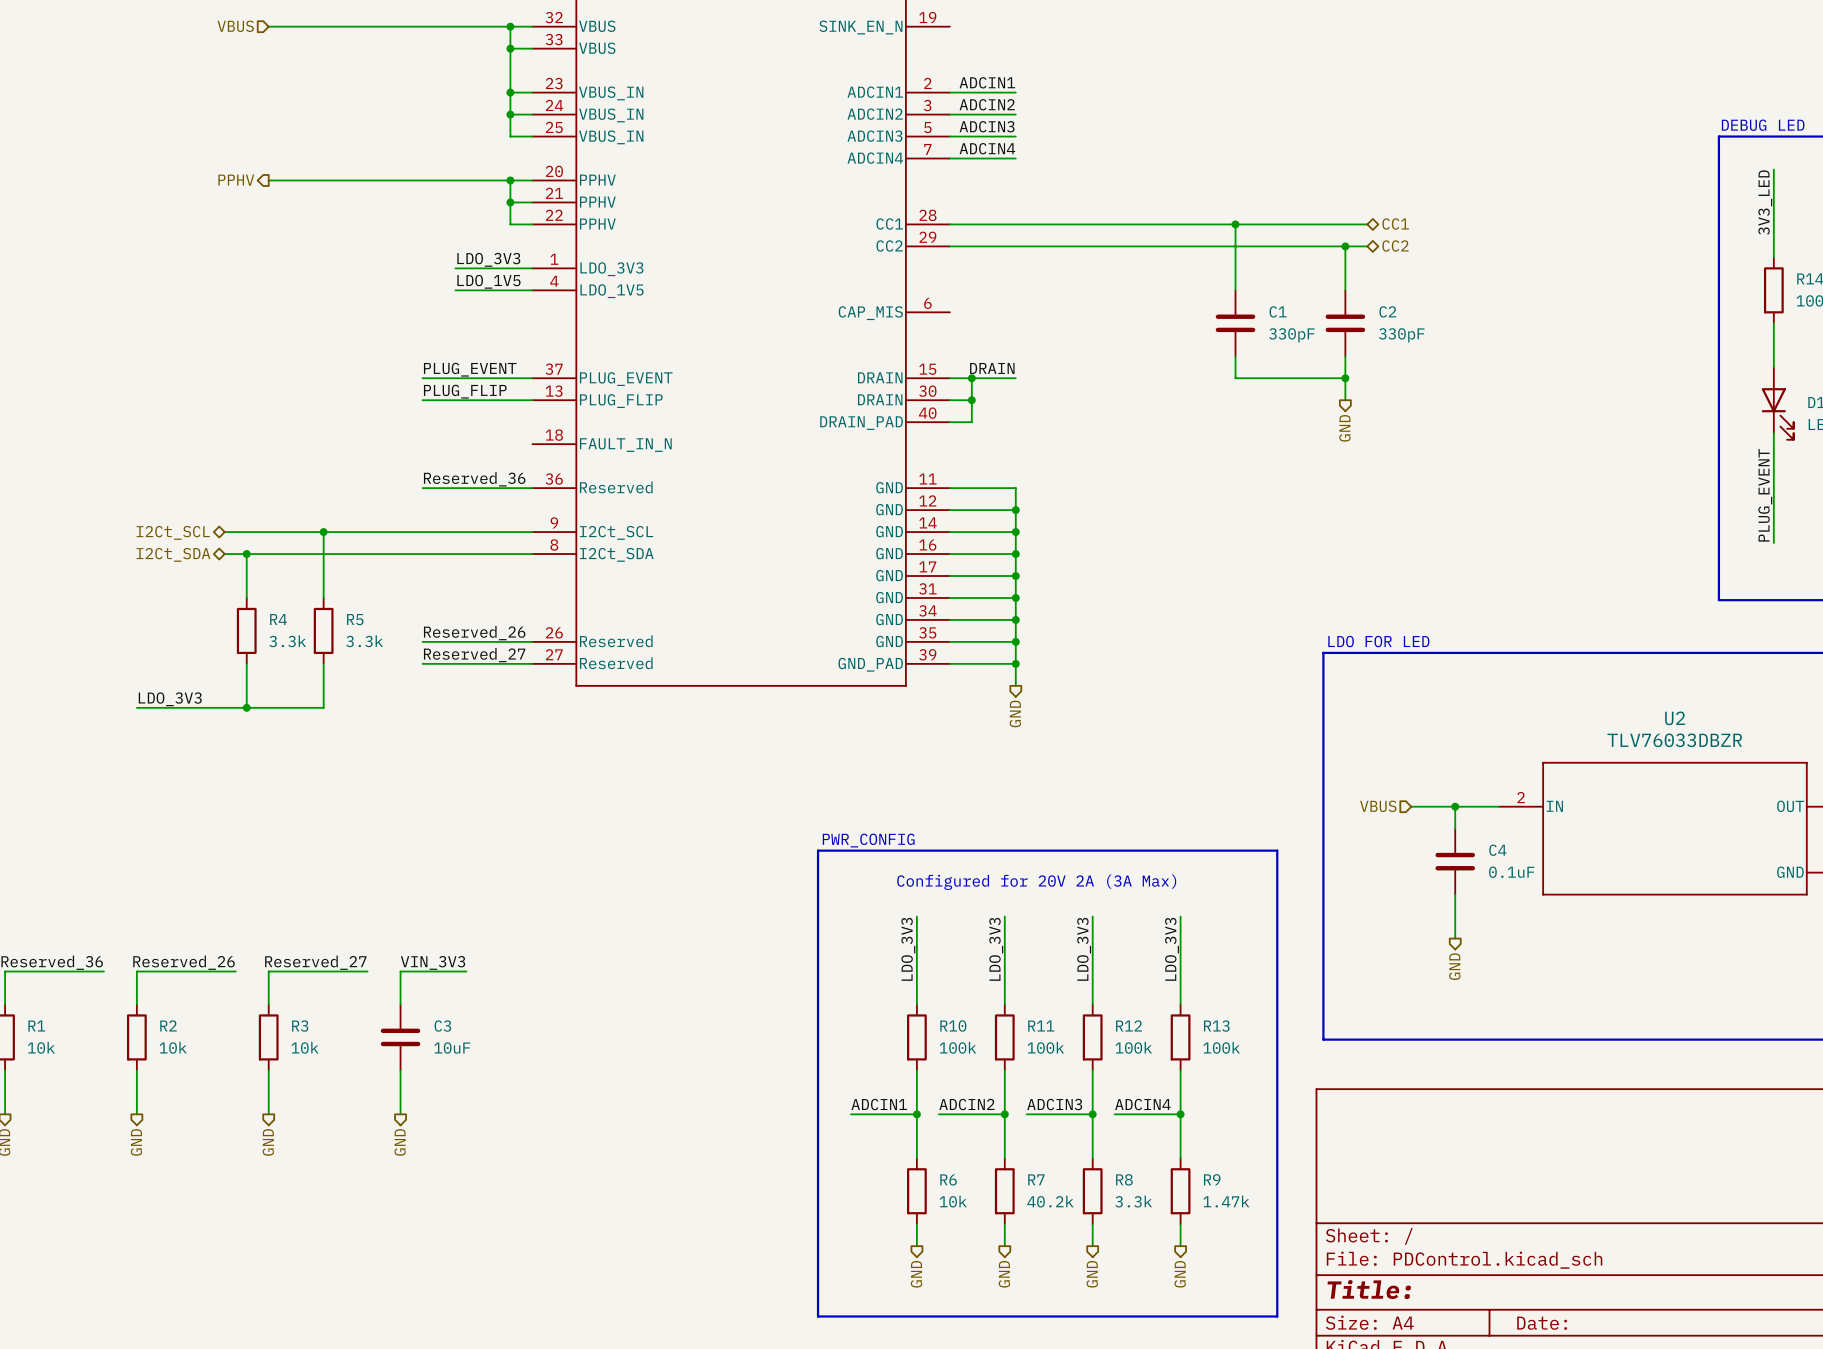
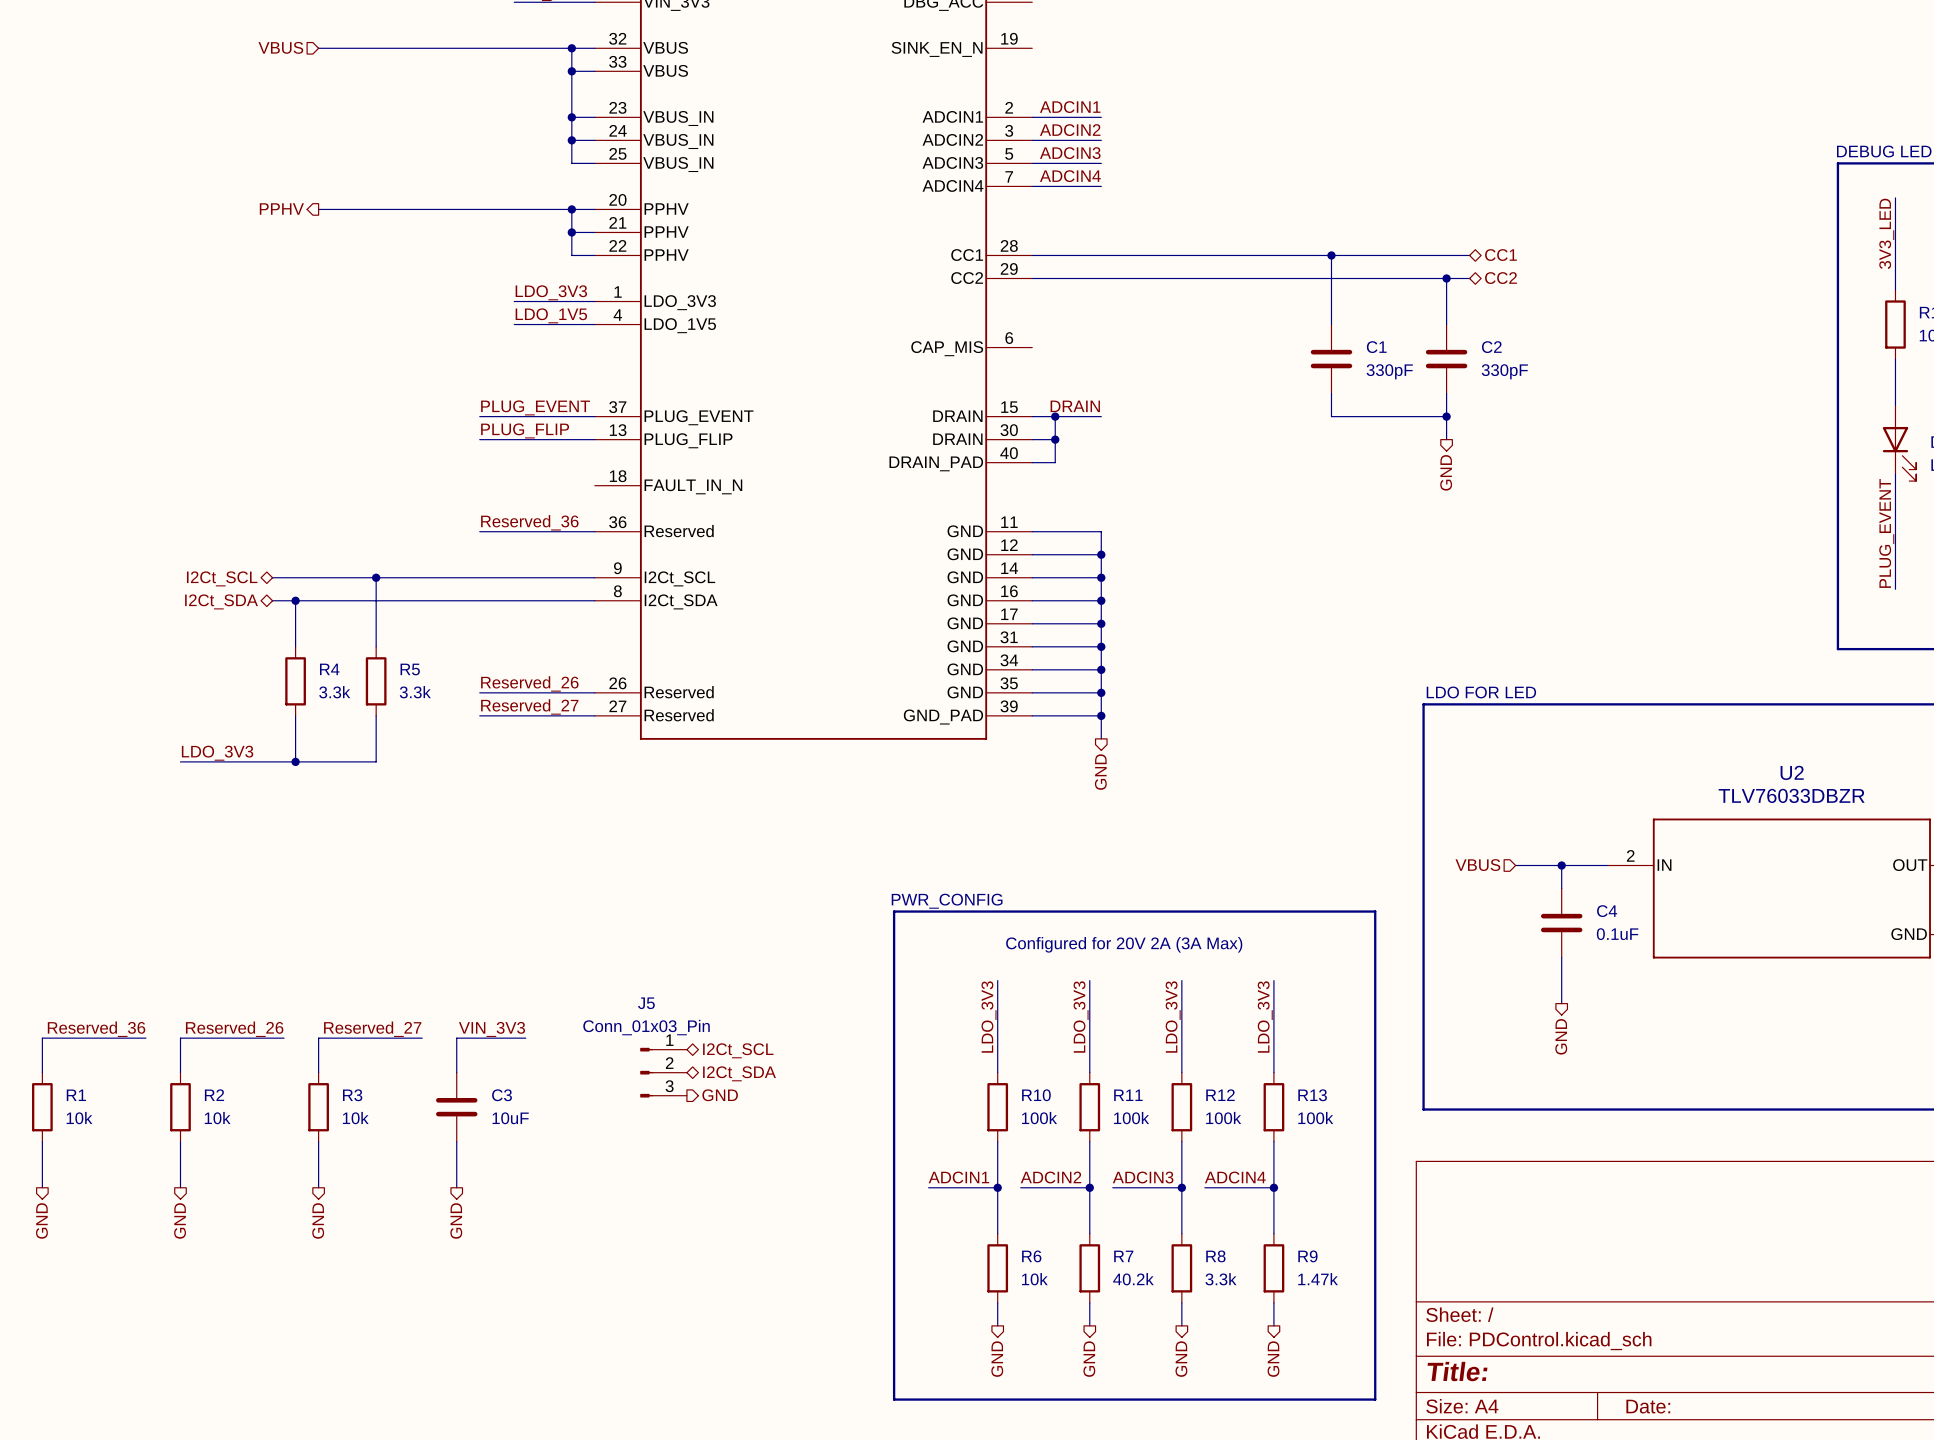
hierarchical label: none -> I2Ct_SCL (738, 1050)
J5: none -> Conn_01x03_Pin (663, 1072)
hierarchical label: none -> I2Ct_SDA (739, 1073)
hierarchical label: none -> GND (720, 1095)

